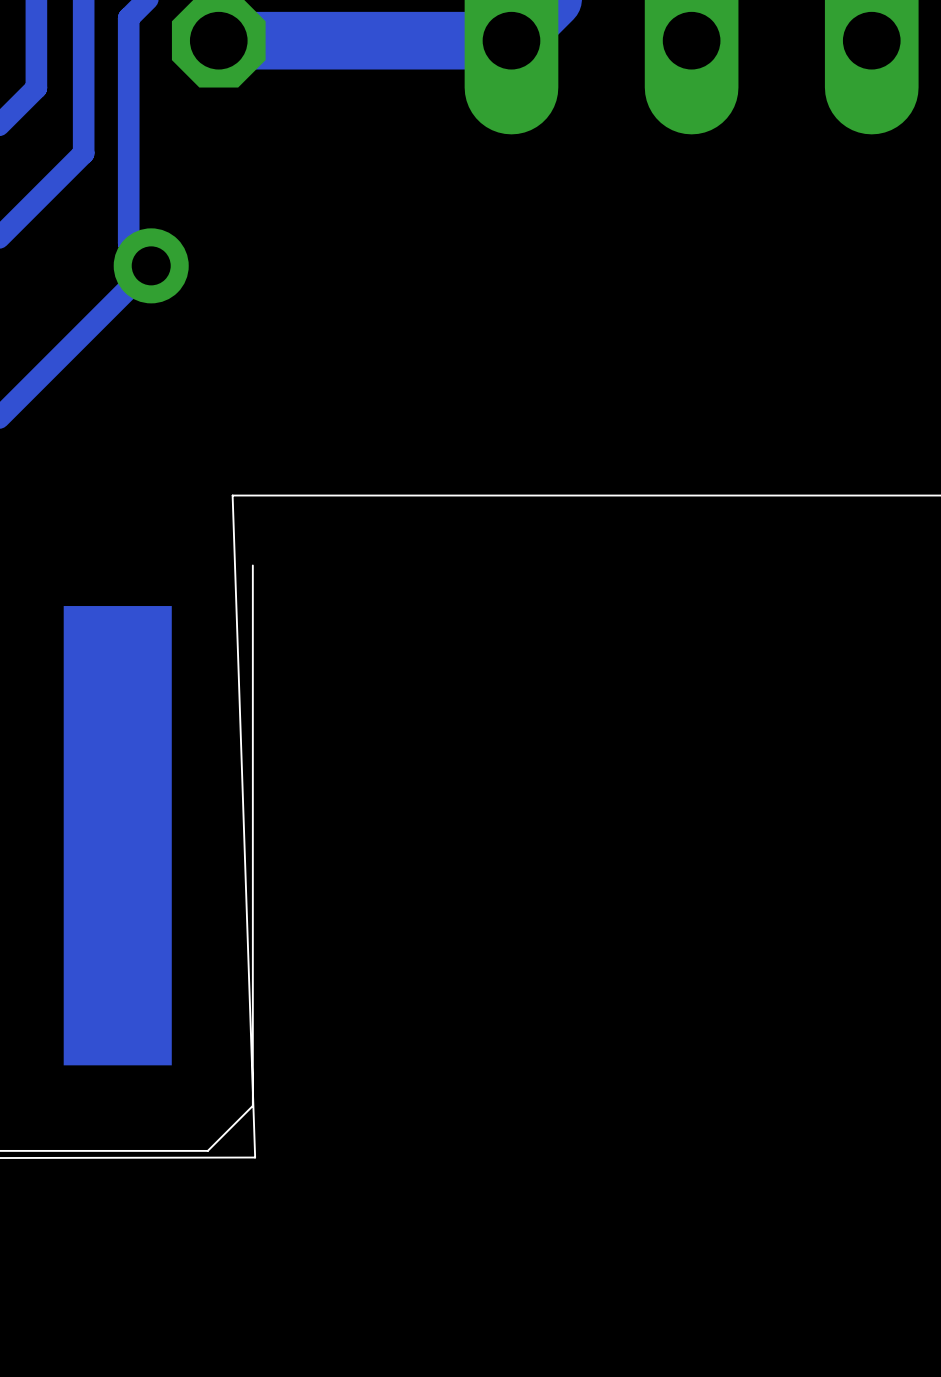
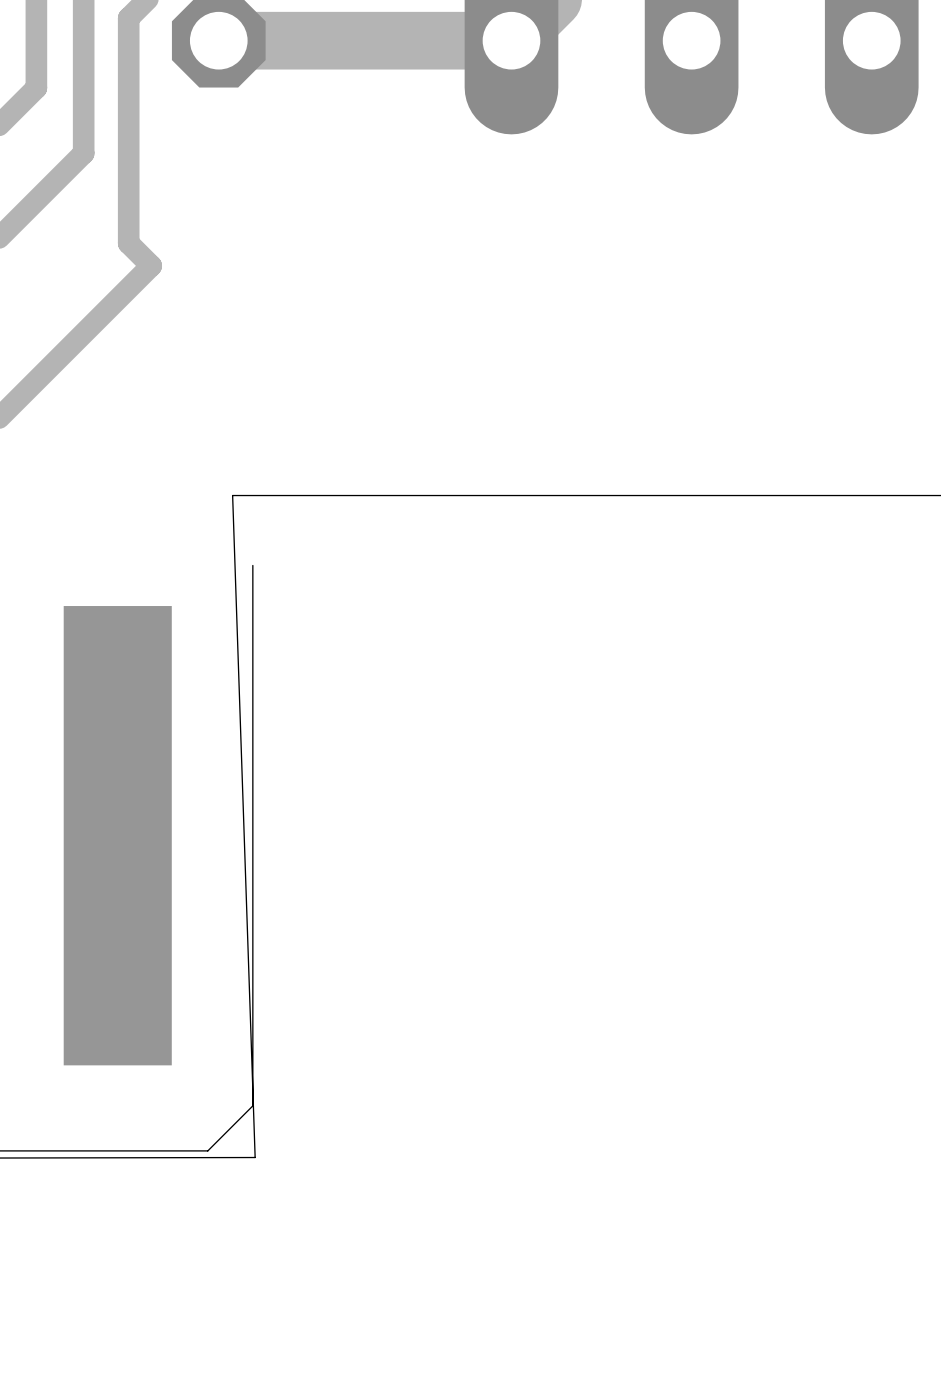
via: (151, 265) -> none

